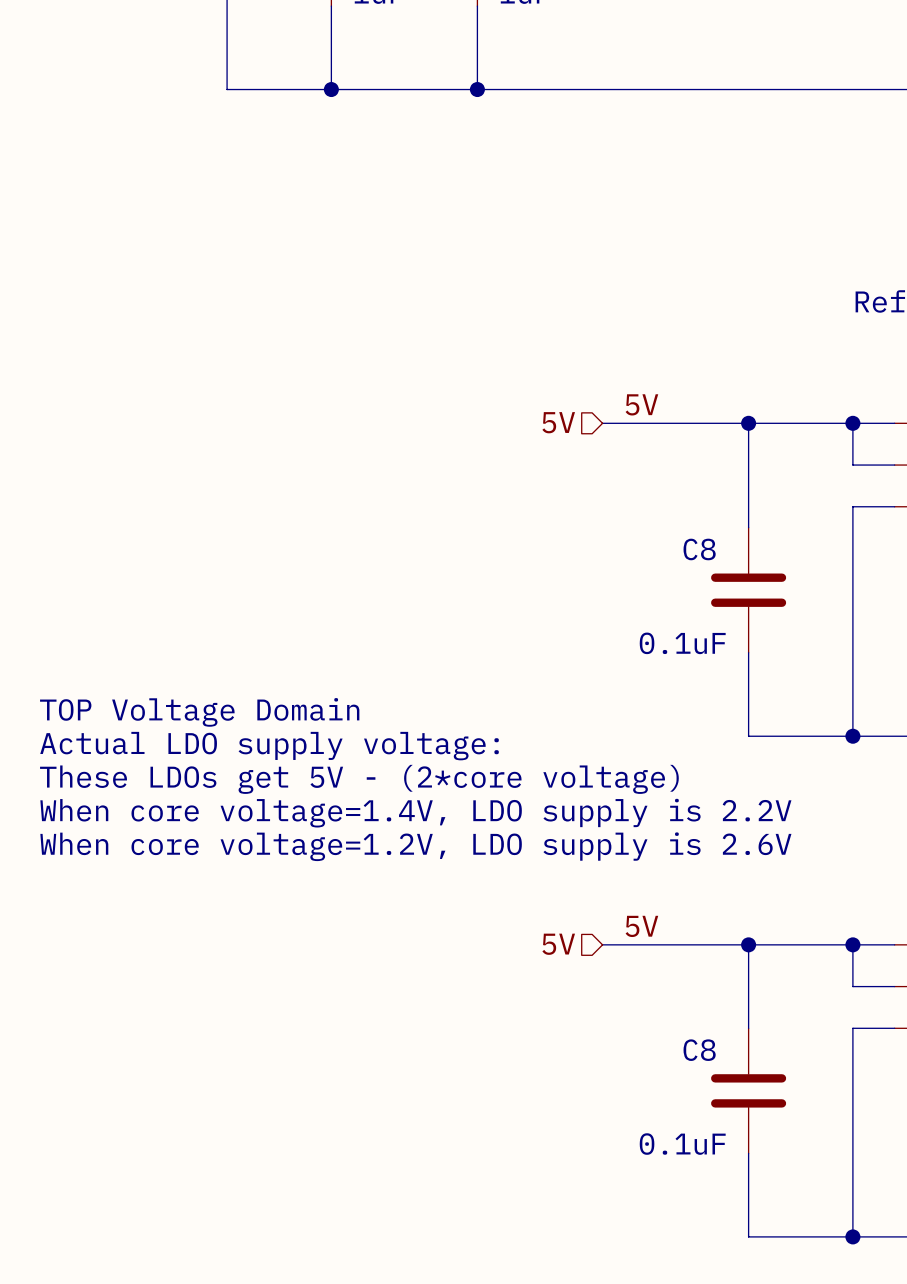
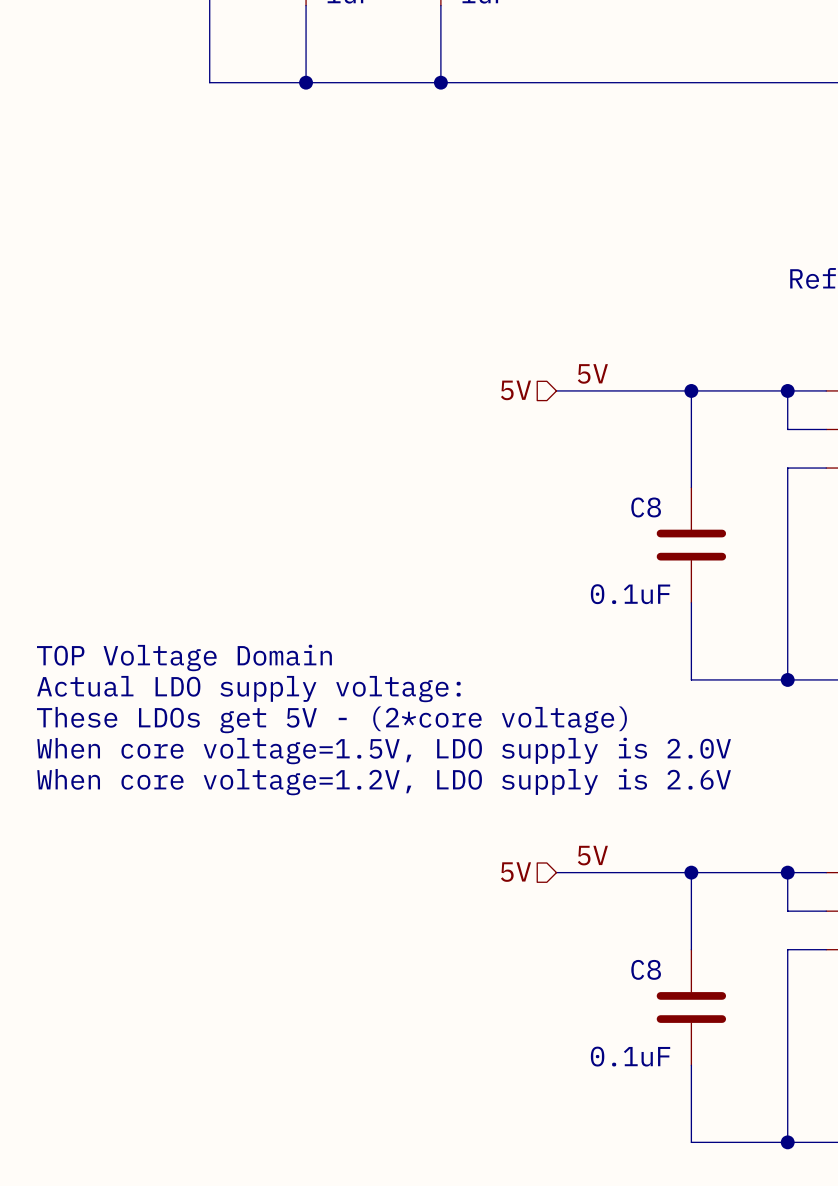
text: When core voltage=1.4V, LDO supply is 2.2V (415, 813) -> When core voltage=1.5V, LDO supply is 2.0V (384, 750)

